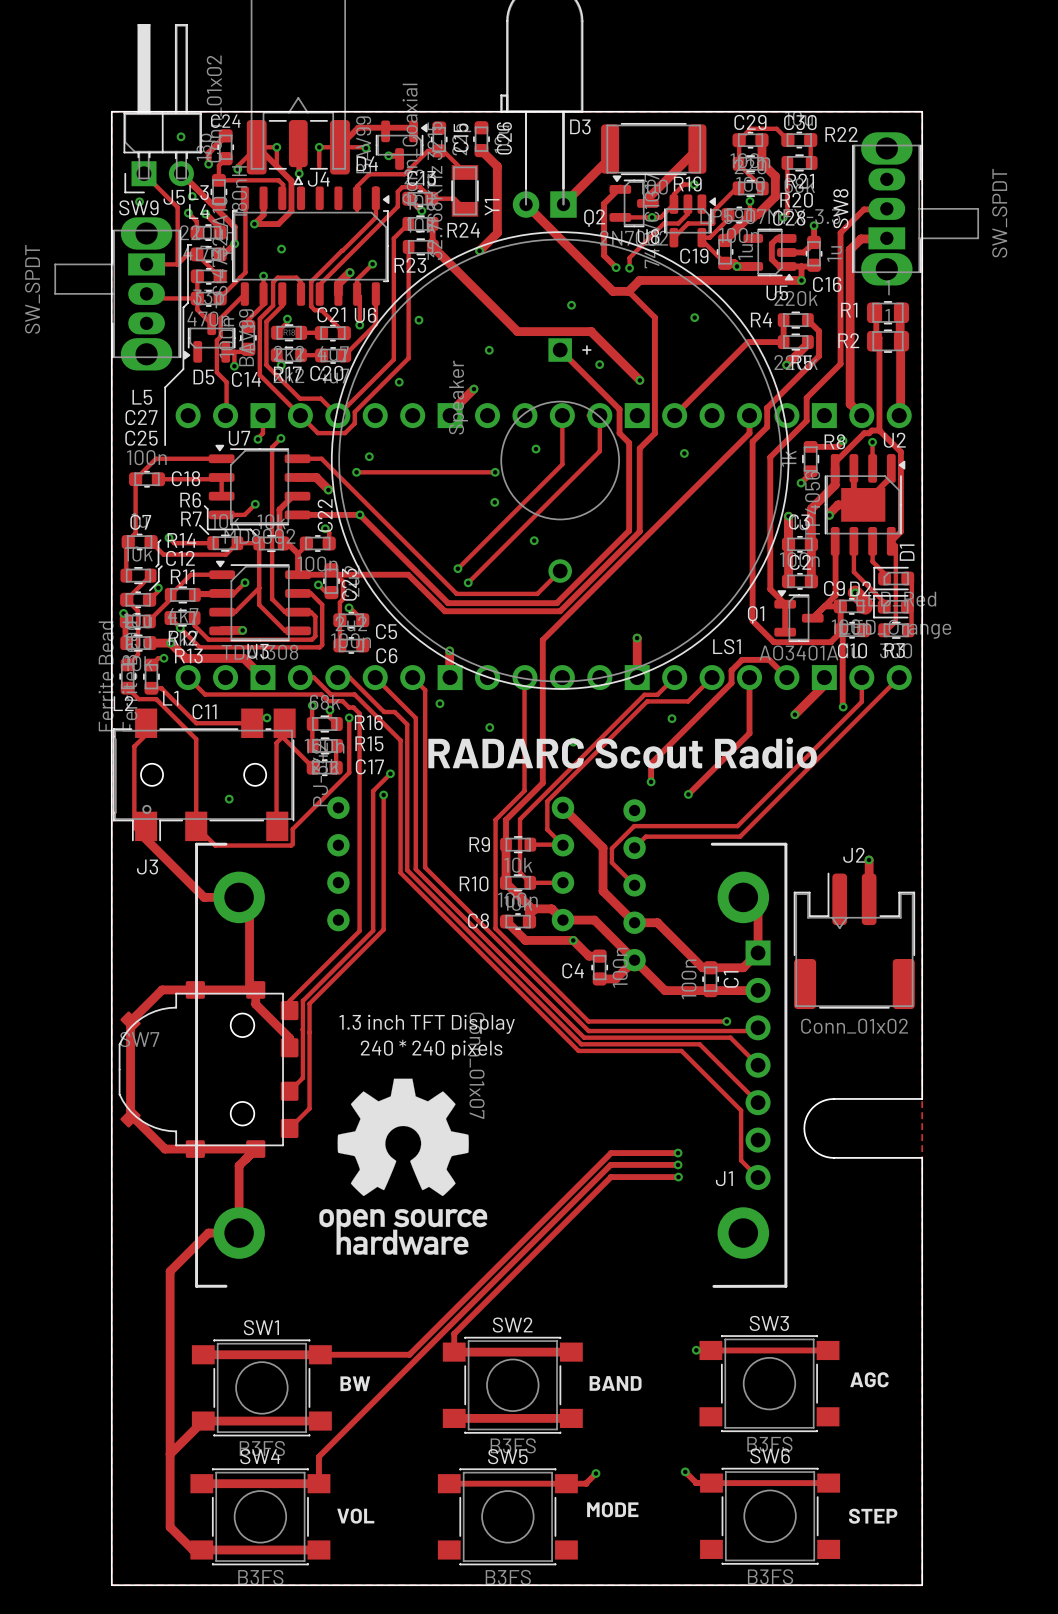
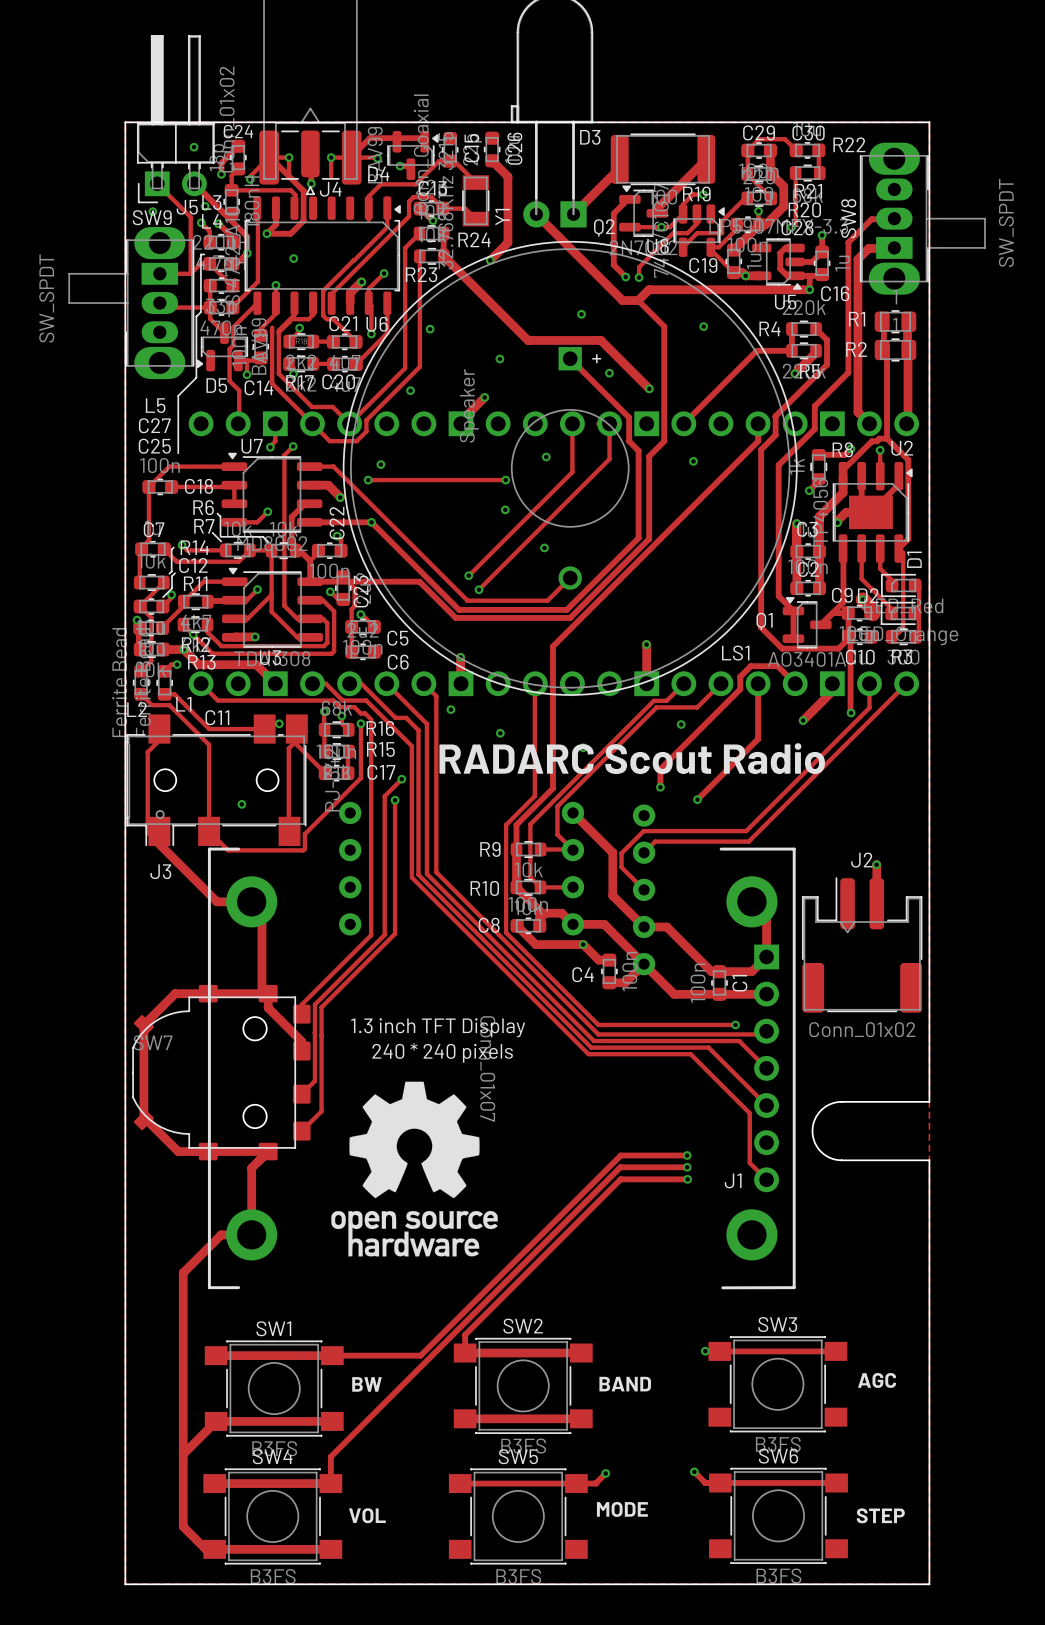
track: (300, 294) (300, 282) (296, 277) (277, 277) (273, 282) (273, 305) (259, 318) -> (313, 303) (313, 314) (308, 319) (290, 319) (278, 332)

